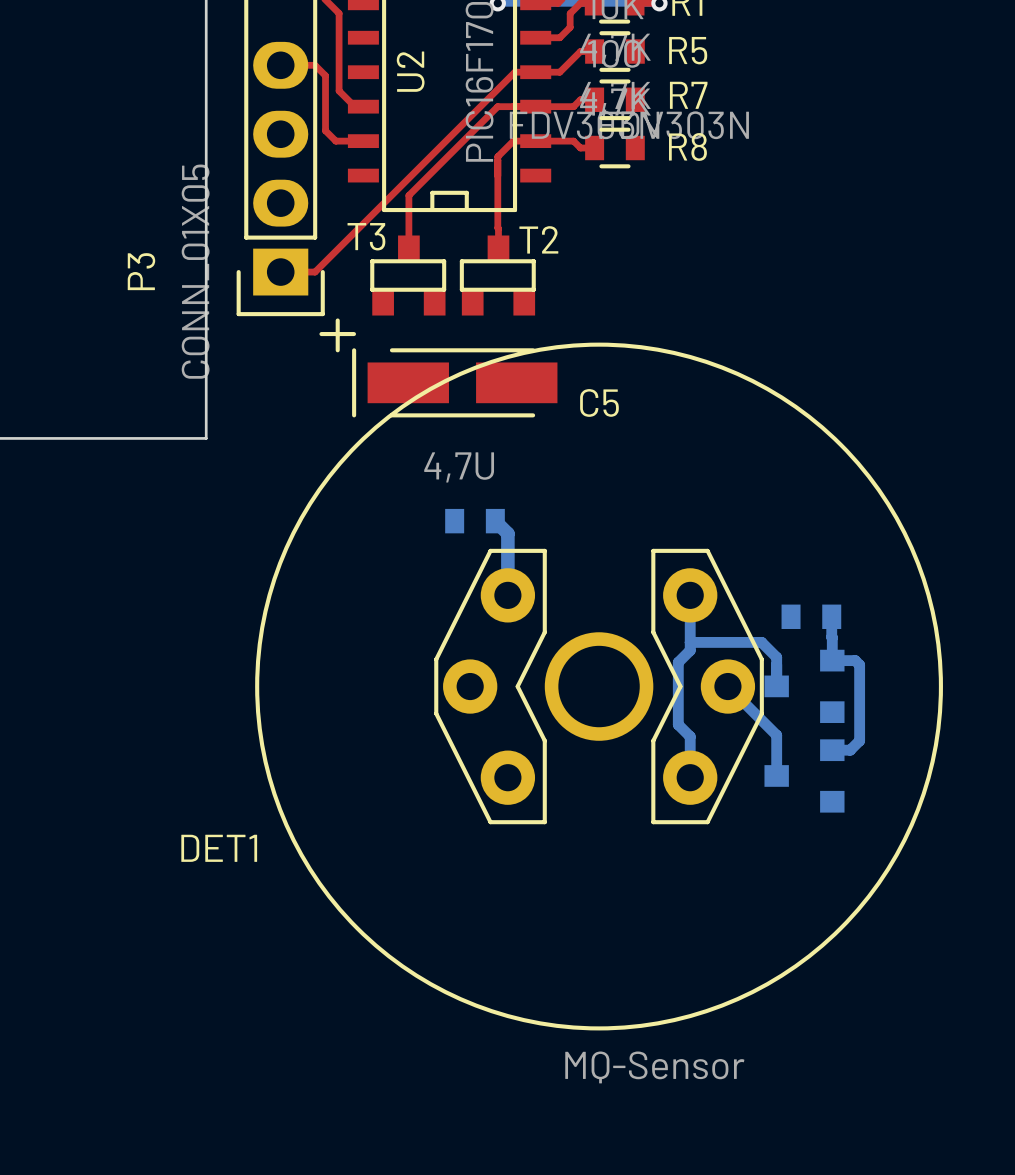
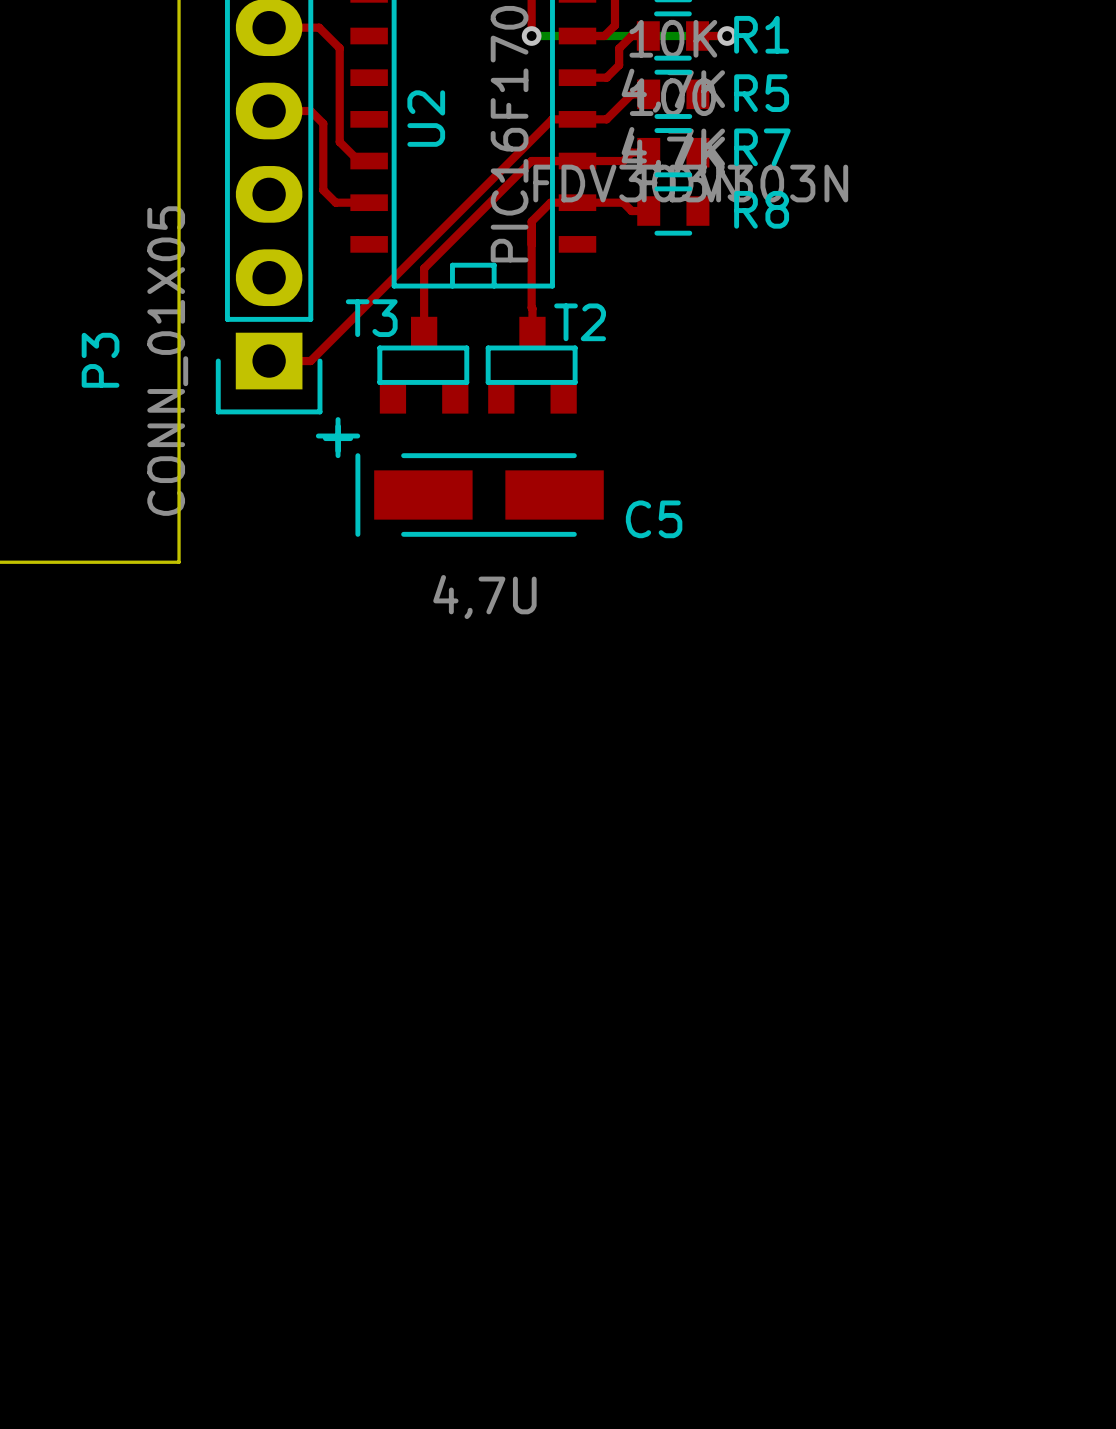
part: (475, 521) -> none
bottom track: (495, 521) (507, 533) (507, 595) -> none
bottom track: (690, 595) (690, 650) (678, 662) (678, 724) (690, 736) (690, 777) -> none
part: (811, 616) -> none
bottom track: (831, 616) (832, 660) (855, 660) (859, 665) (859, 740) (850, 750) (832, 750) -> none
bottom track: (690, 642) (761, 642) (776, 657) (775, 686) -> none
DET1: MQ-Sensor (599, 686) -> none
bottom track: (727, 686) (776, 735) (776, 775) -> none
part: (804, 686) -> none
part: (804, 775) -> none

